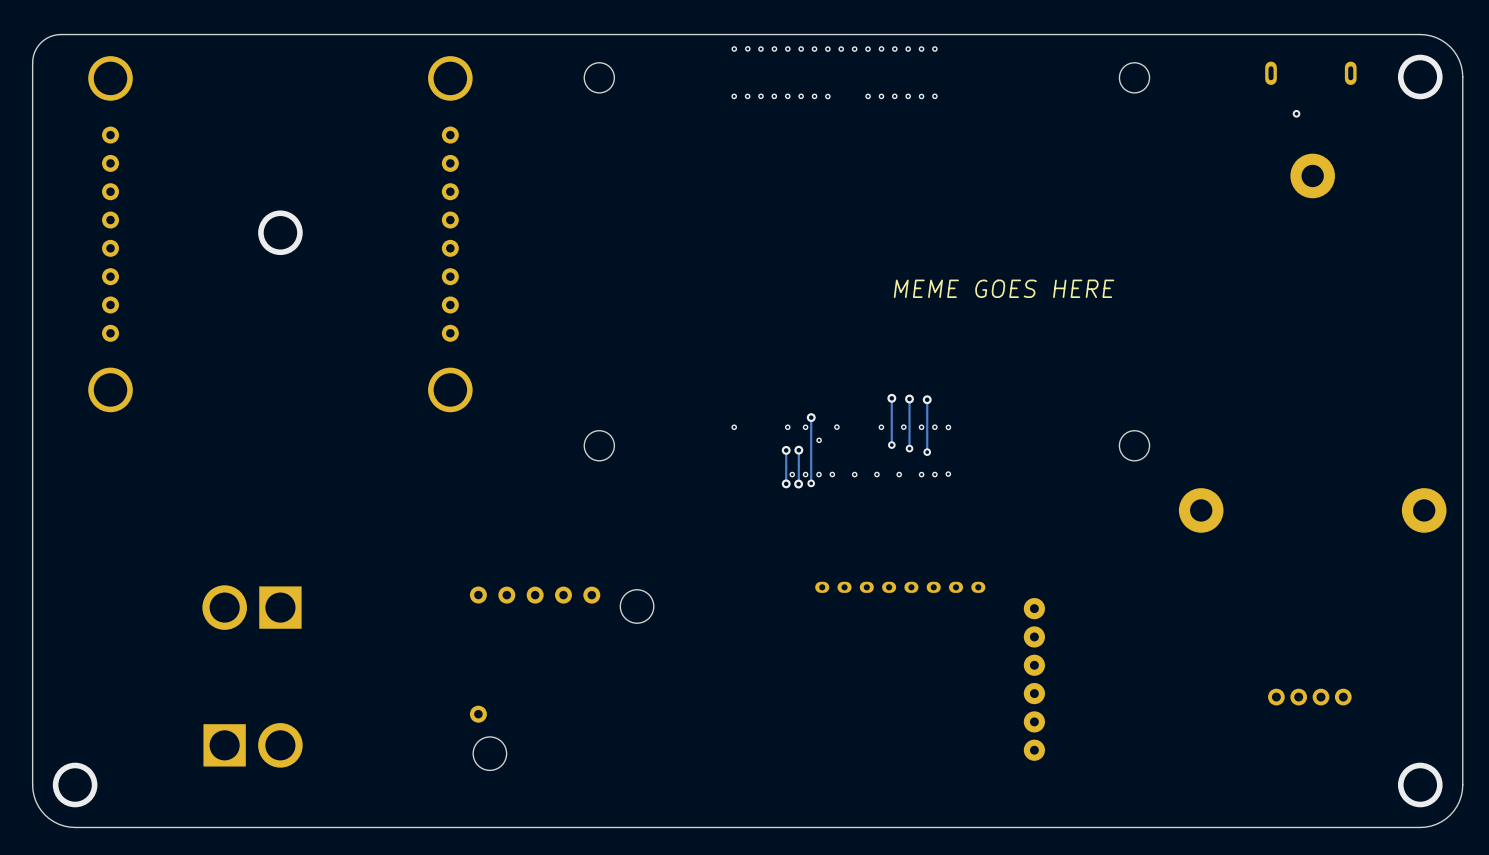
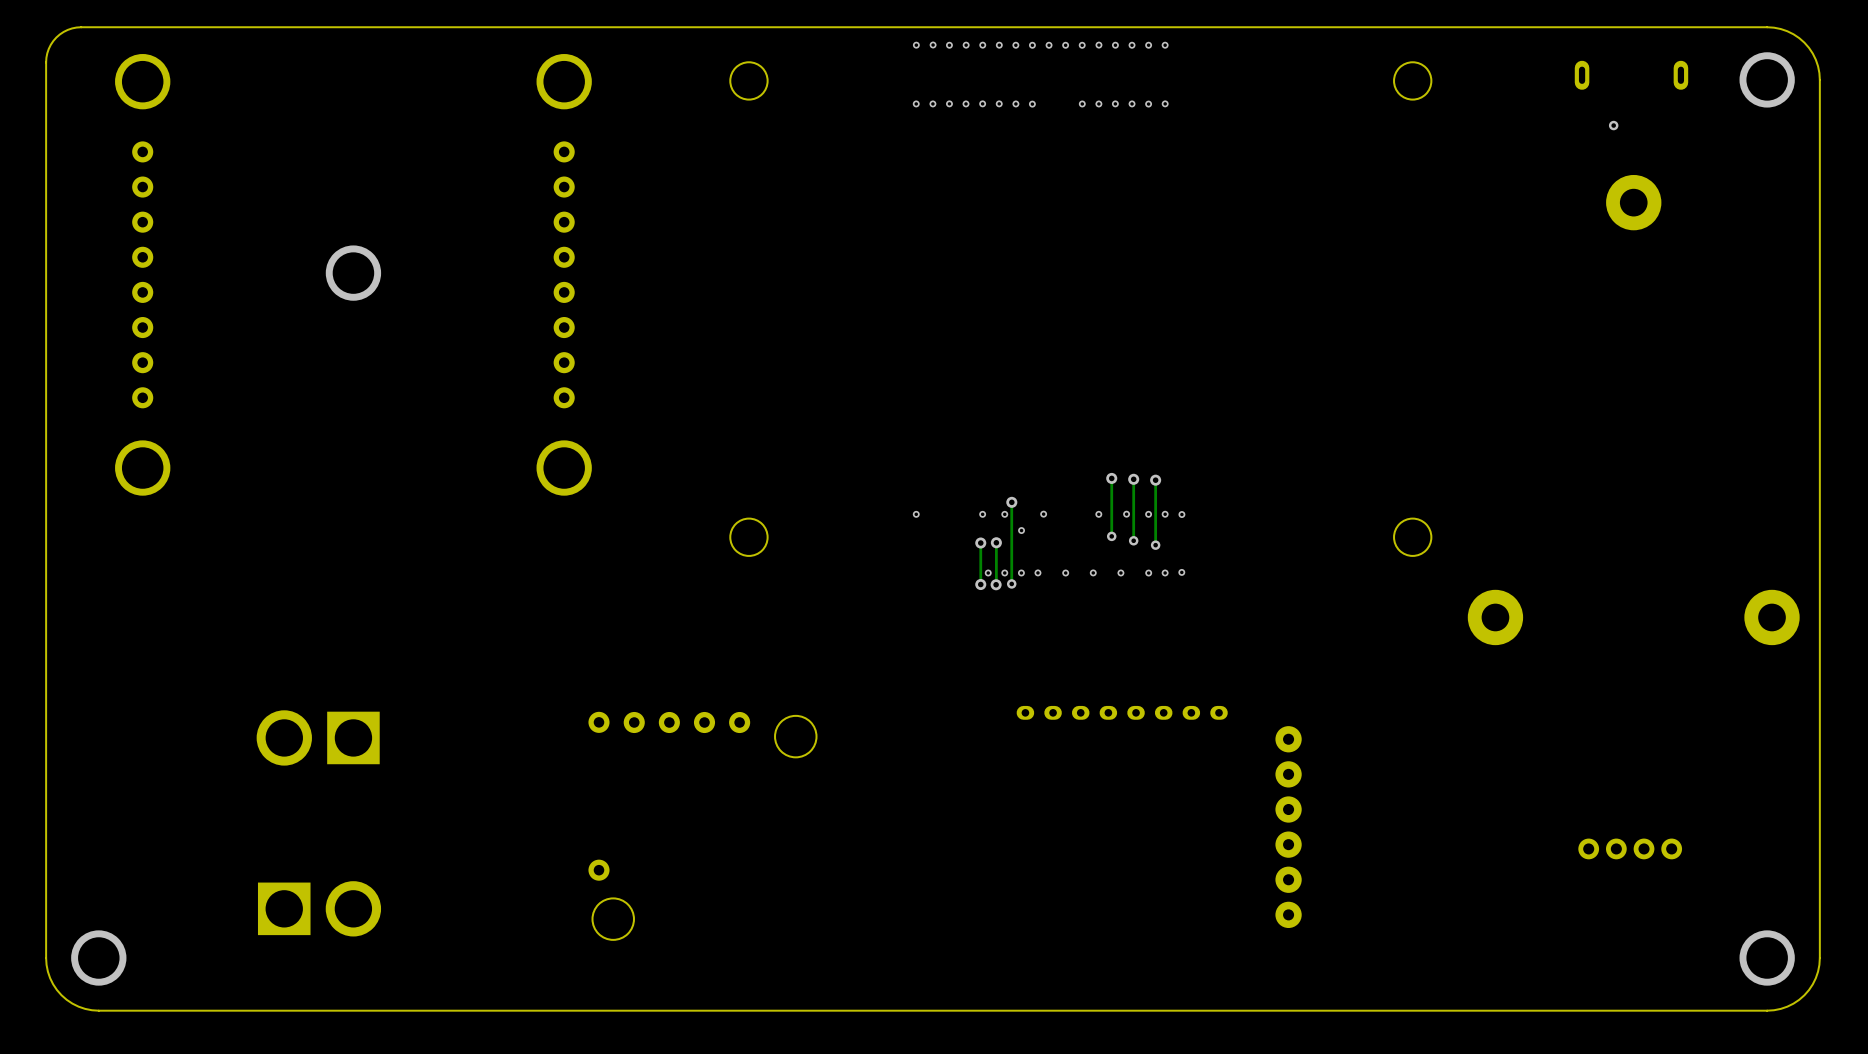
text: MEME GOES HERE (1004, 288) -> none

